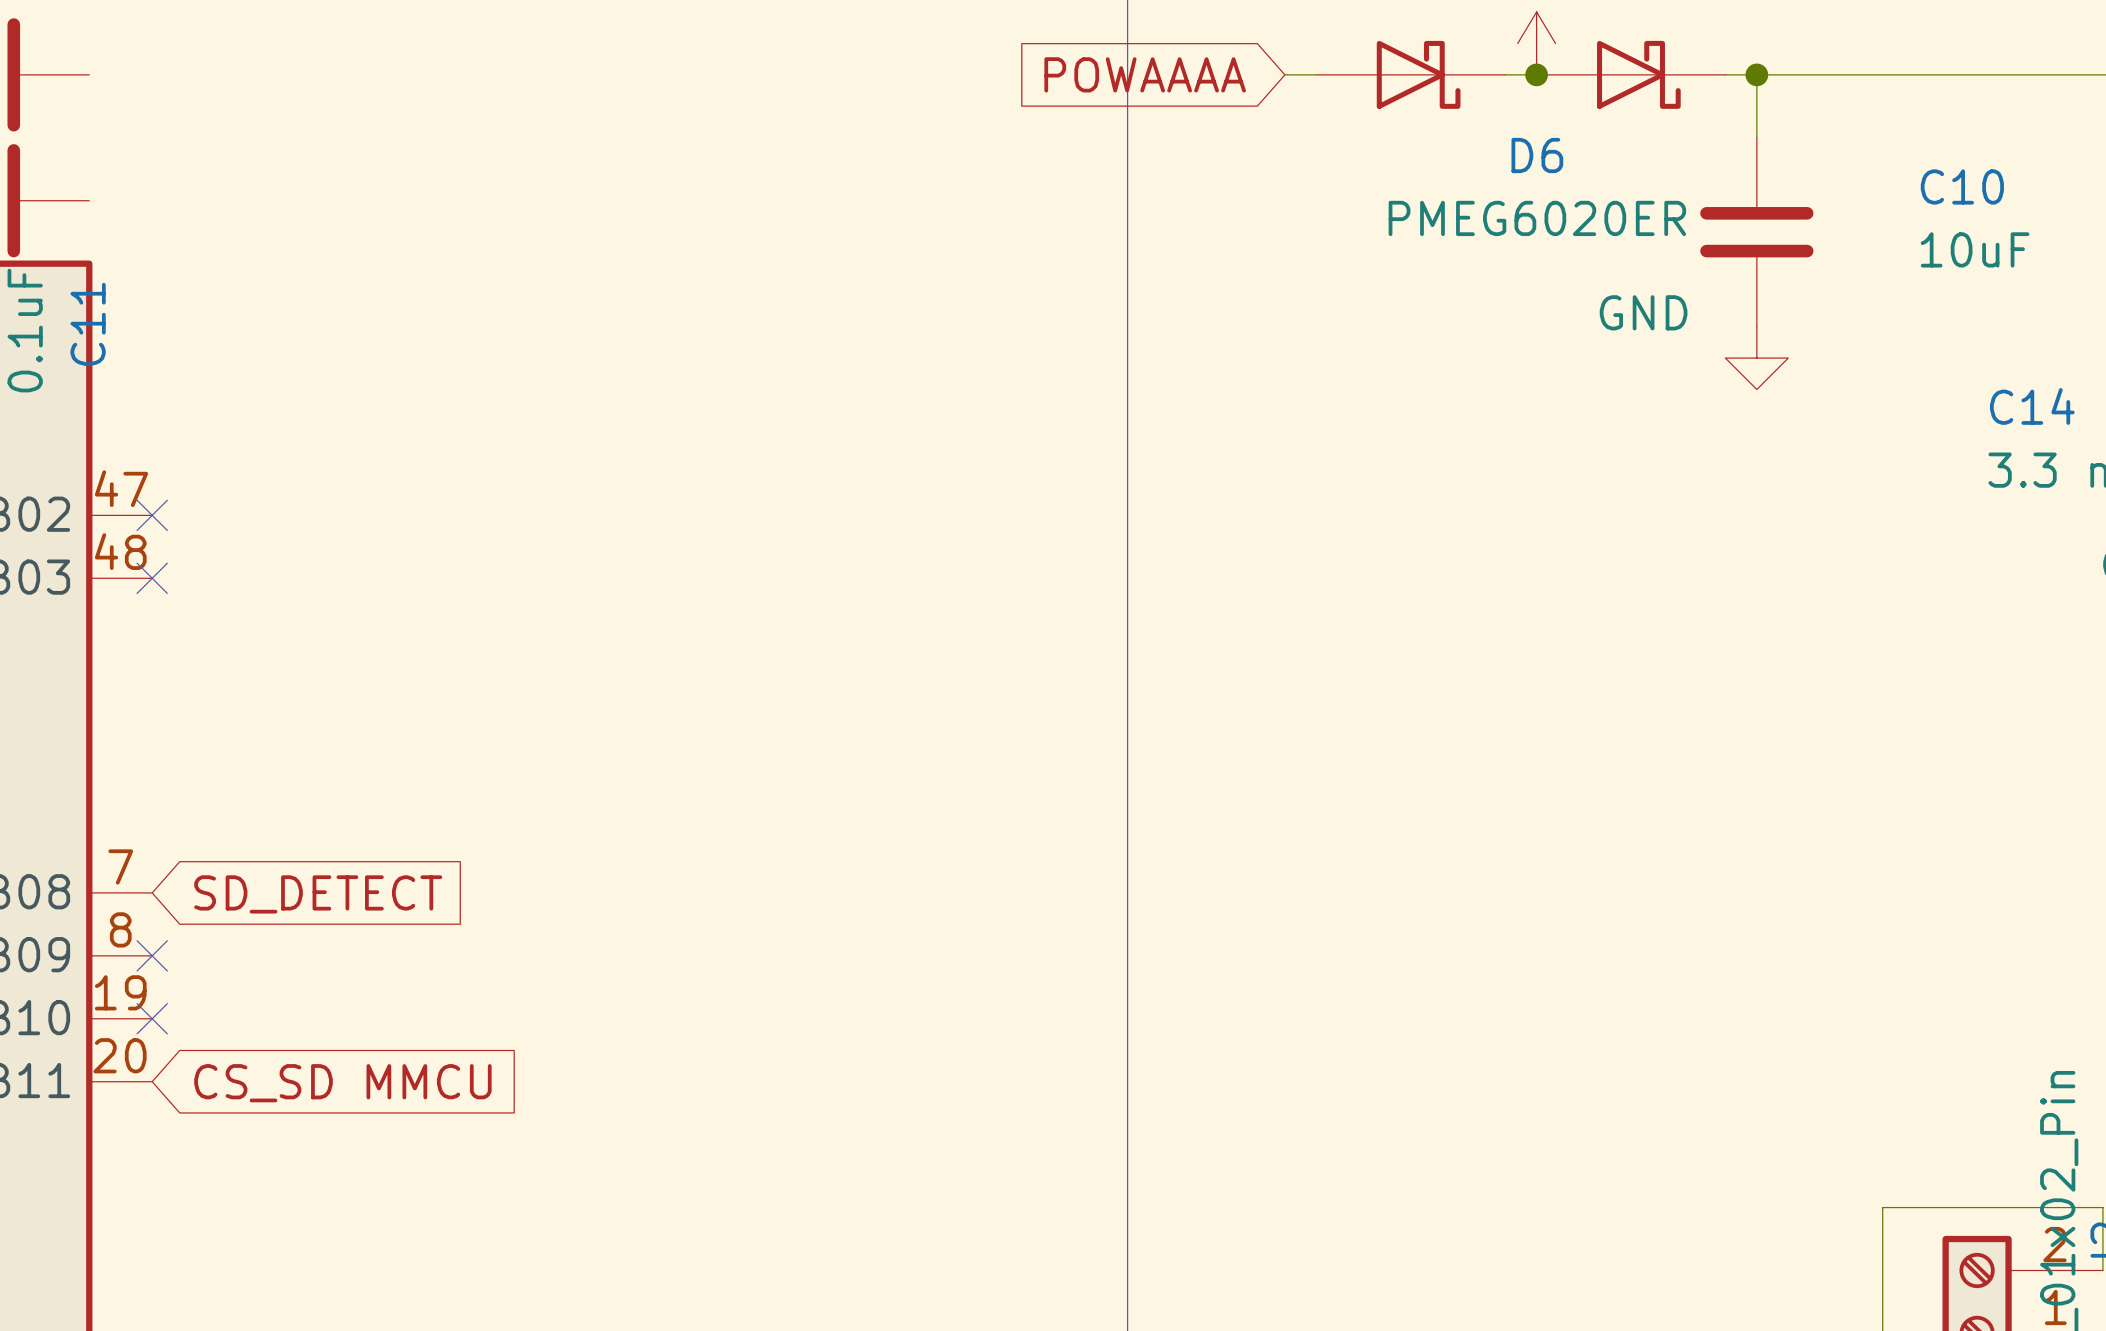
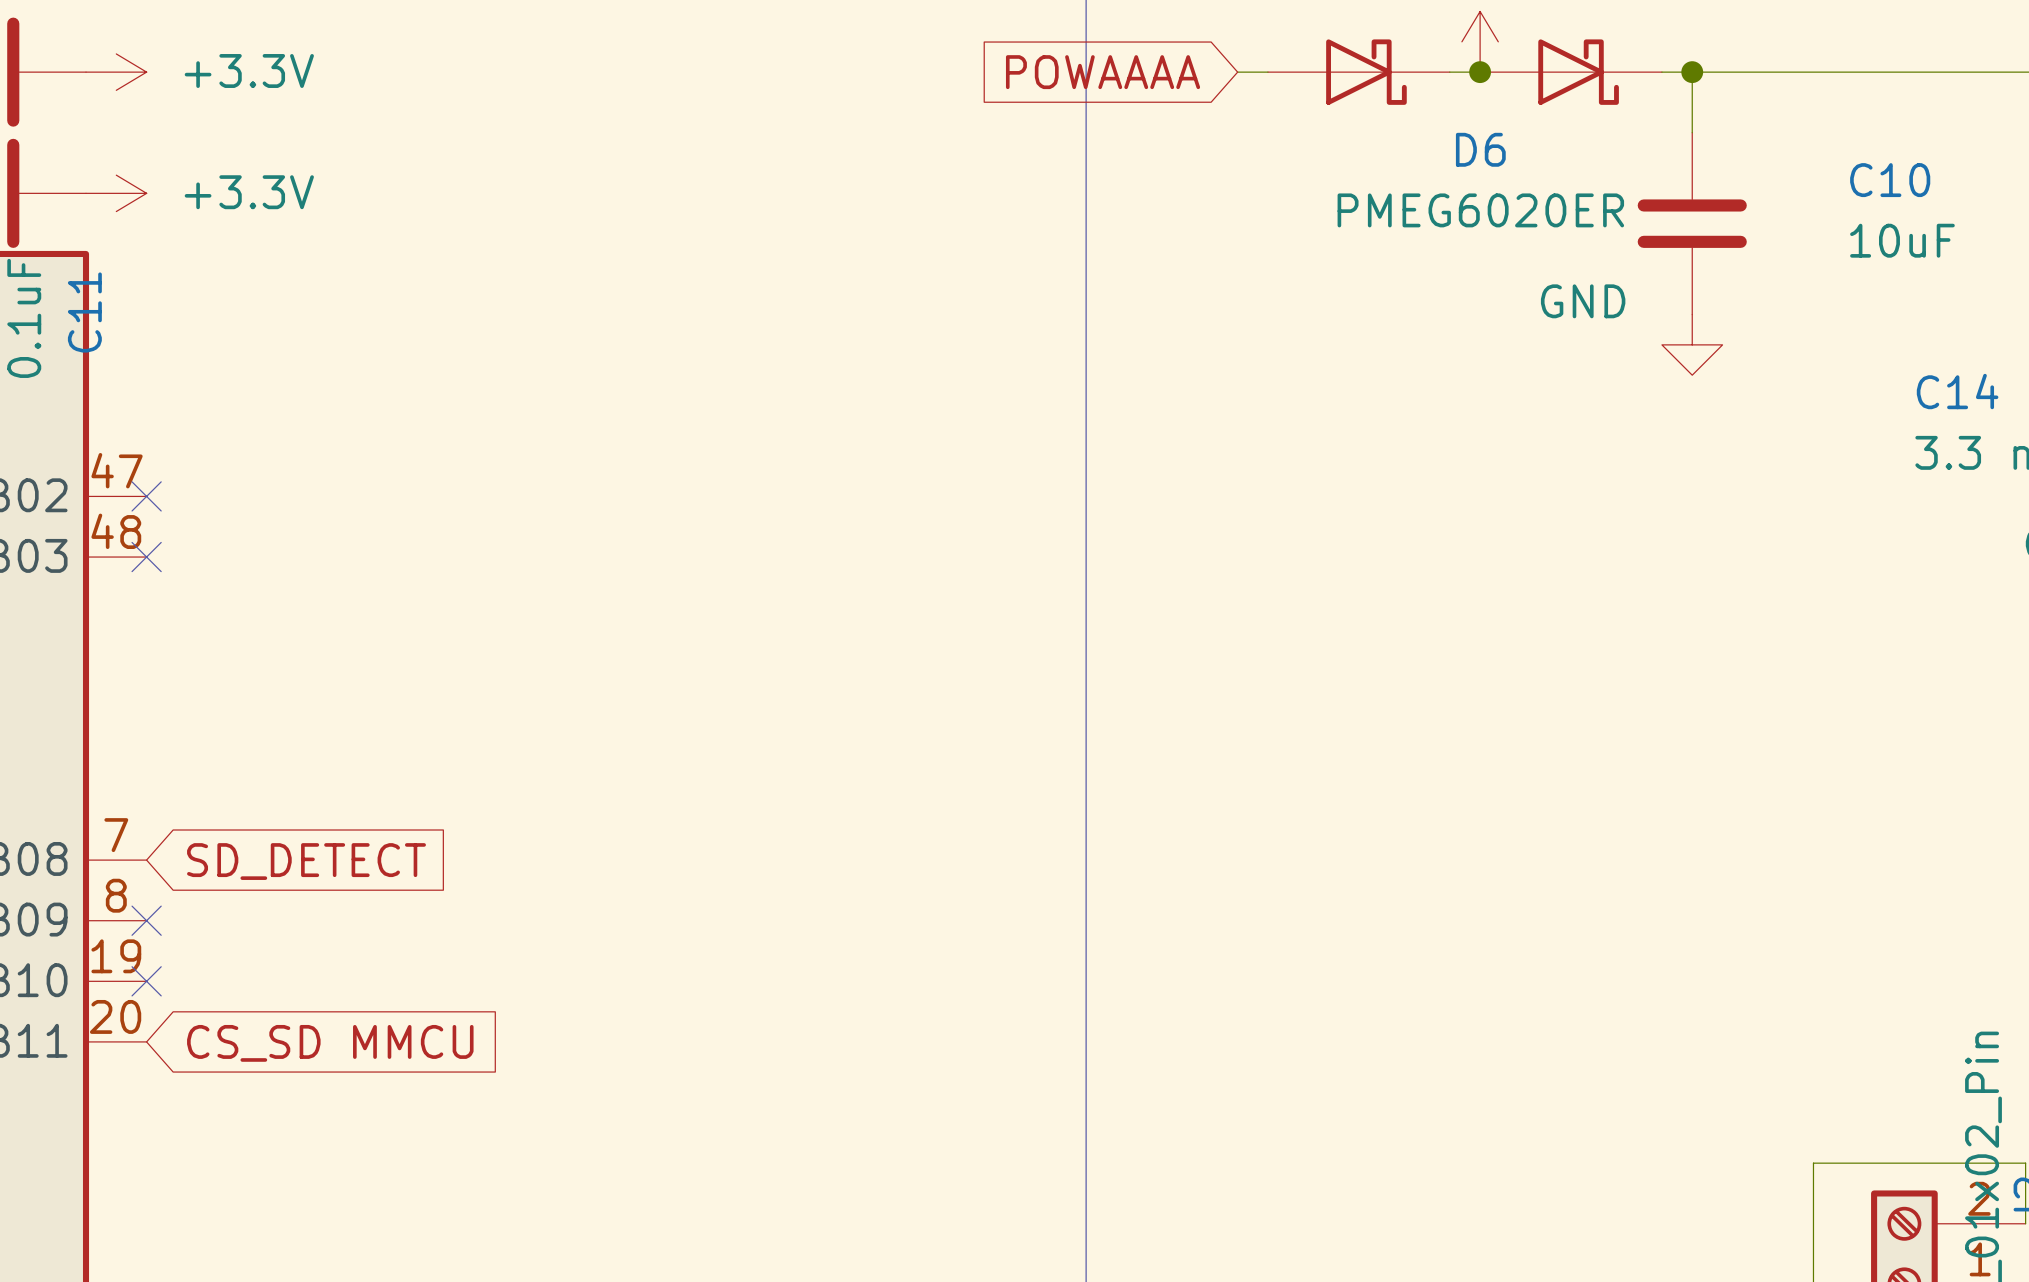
power symbol: none -> +3.3V (116, 72)
power symbol: none -> +3.3V (116, 193)

